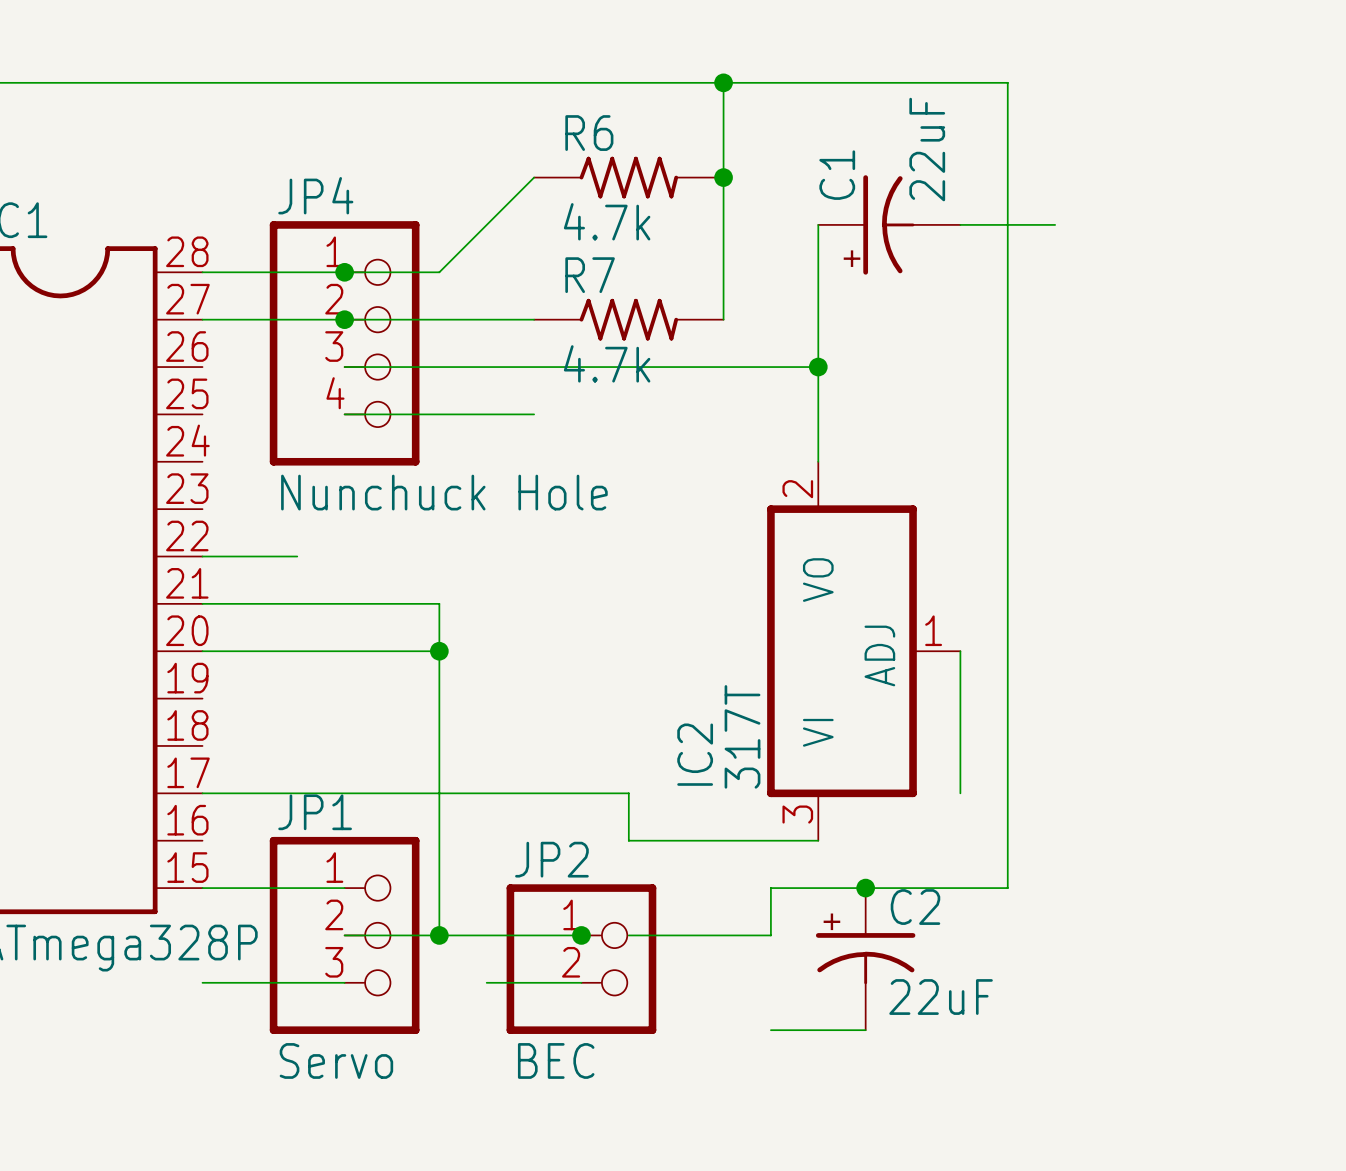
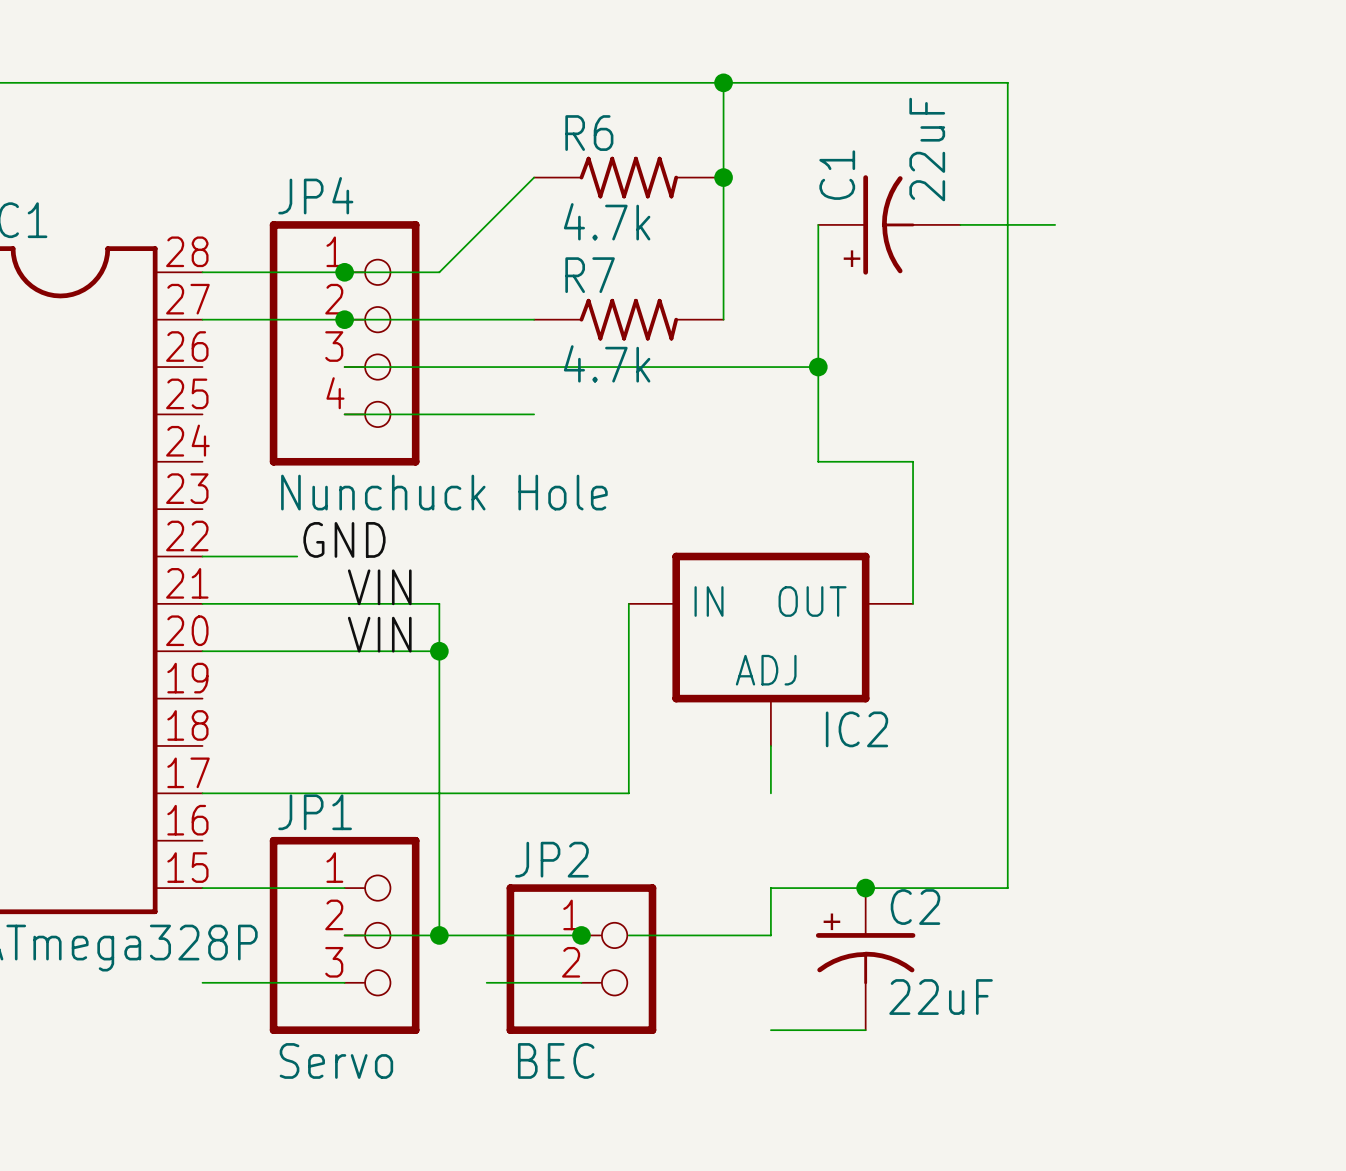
IC2 symbol: [767, 461, 961, 841] -> [628, 552, 914, 746]
wire: none -> (818, 461) (913, 461) (913, 603)
label: none -> GND (344, 539)
label: none -> VIN (379, 587)
label: none -> VIN (379, 634)
wire: (960, 651) (960, 793) -> none
IC2 value: 317T (742, 736) -> none
IC2 name position: IC2 (695, 754) -> IC2 (856, 729)
wire: (628, 793) (628, 840) (818, 840) -> (628, 793) (628, 603)

